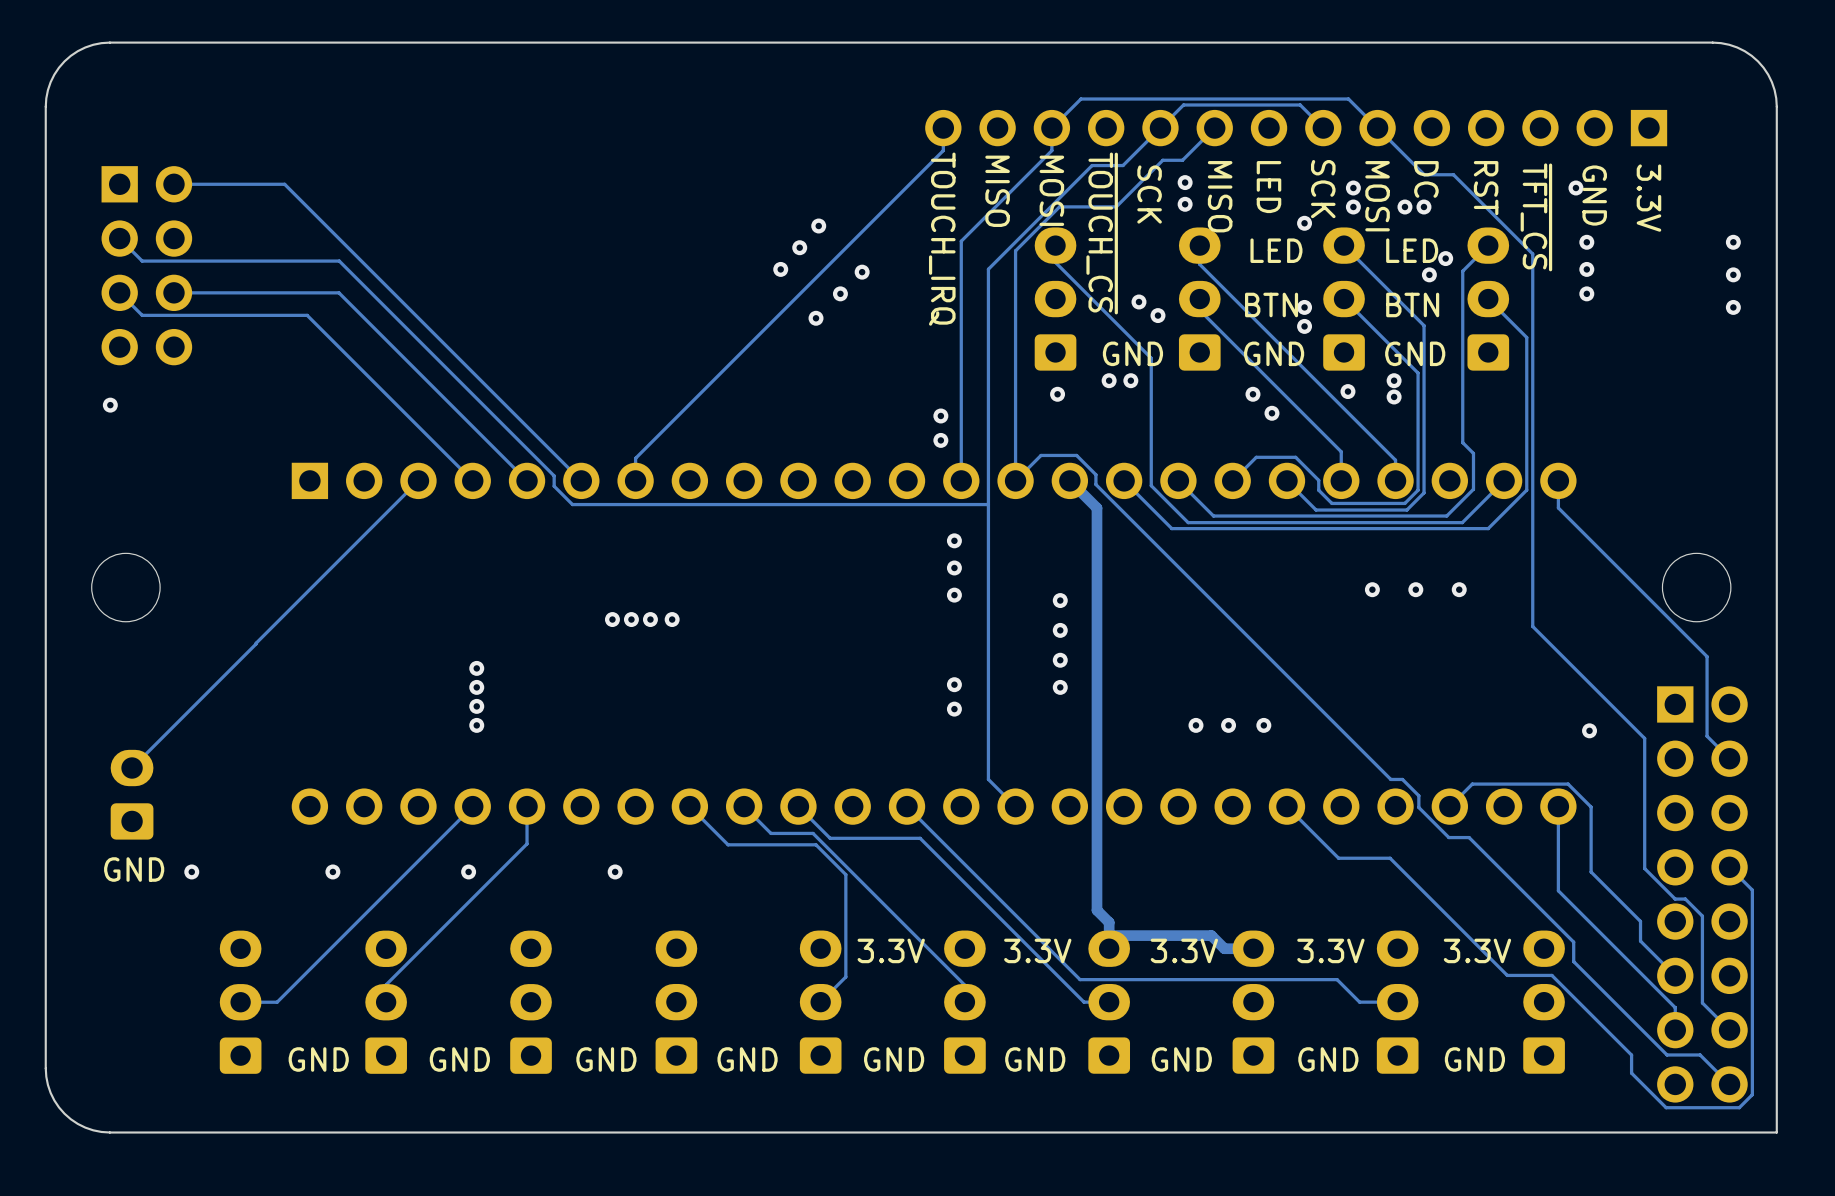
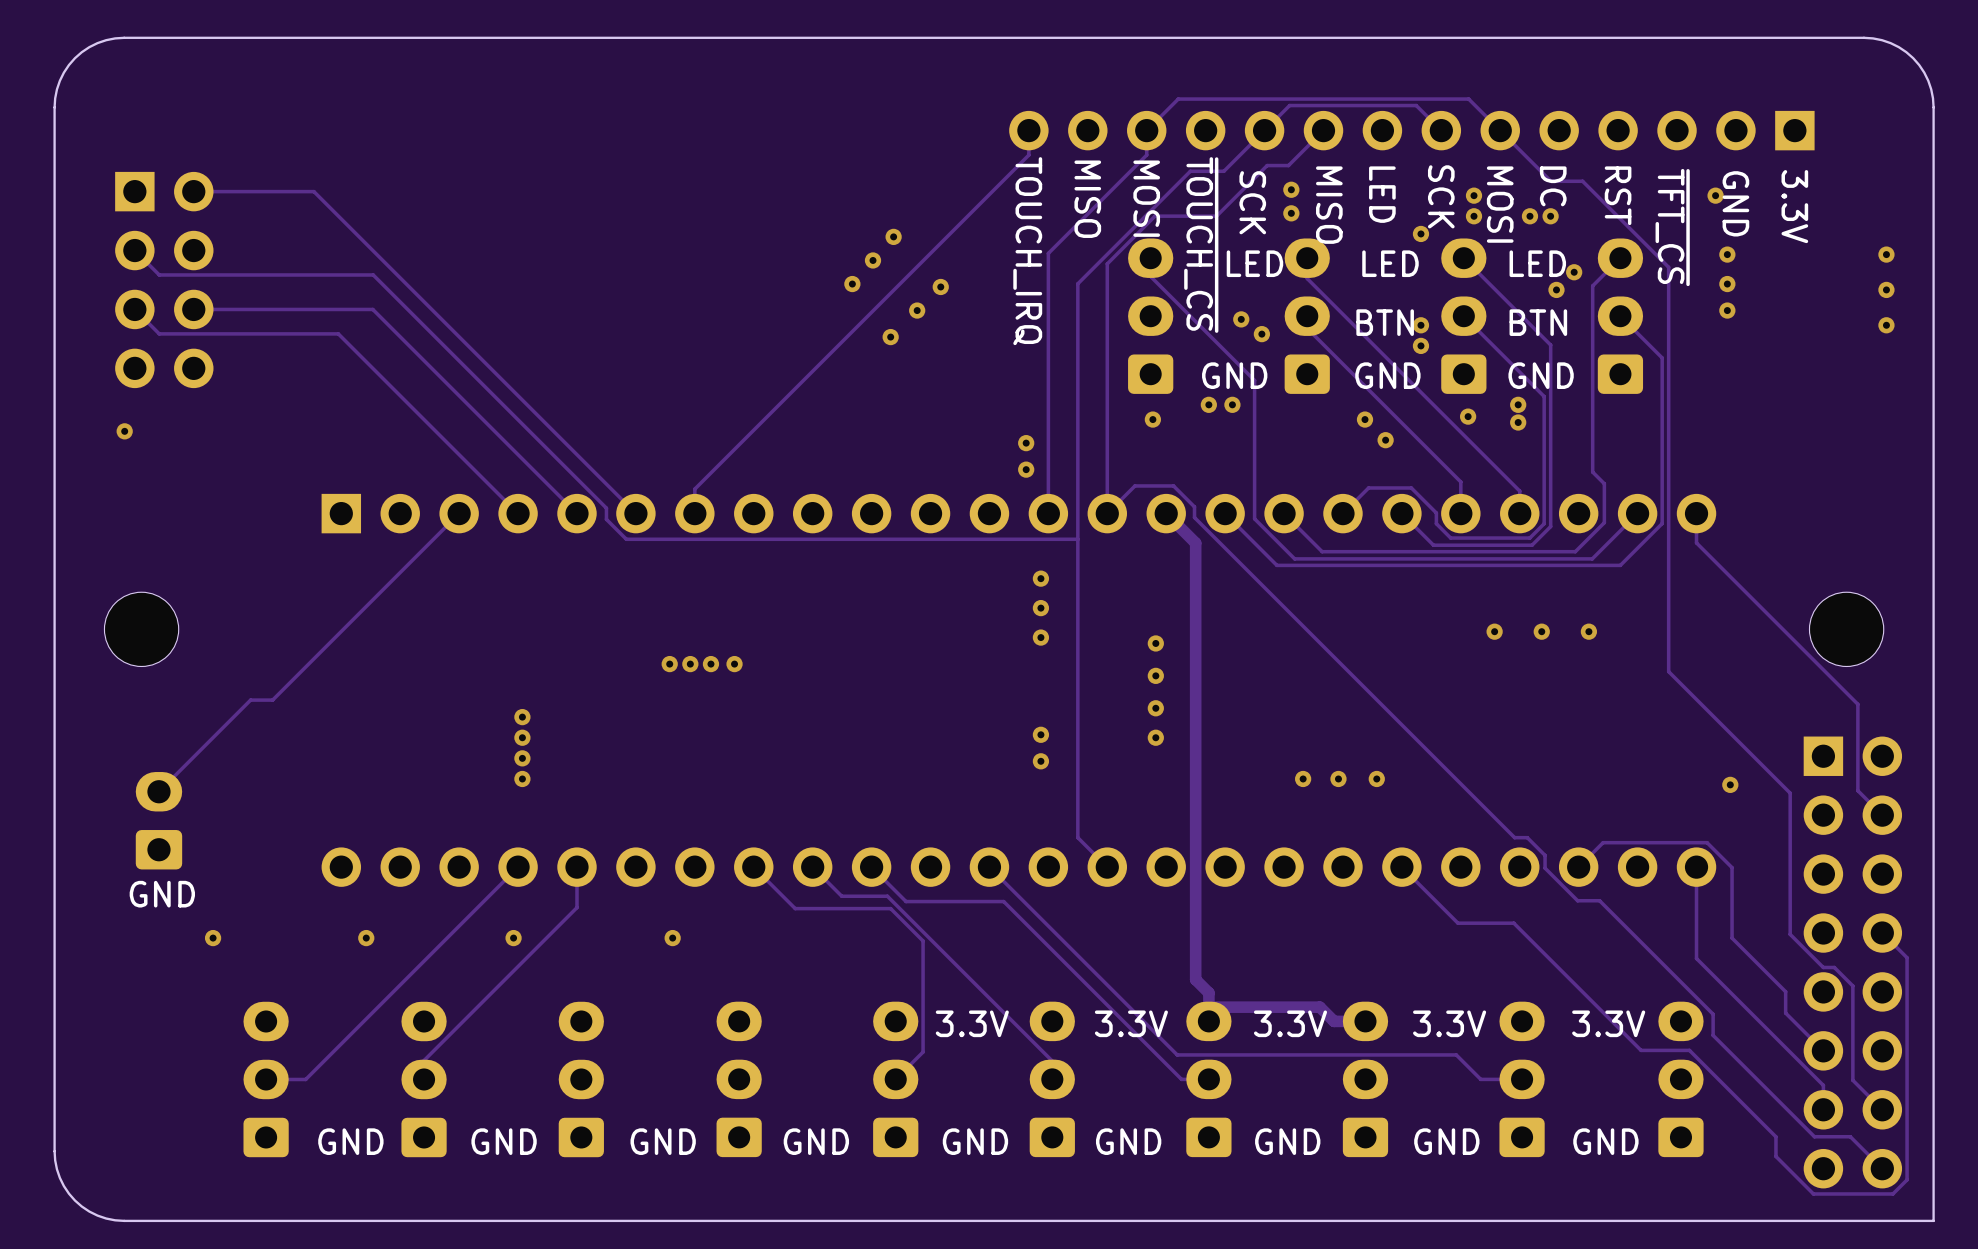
text: none -> LED (1254, 263)
track: (256, 643) (132, 768) -> (282, 689) (272, 700) (250, 700) (158, 791)
part position: (132, 794) -> (158, 820)
text position: GND (134, 869) -> GND (162, 894)

